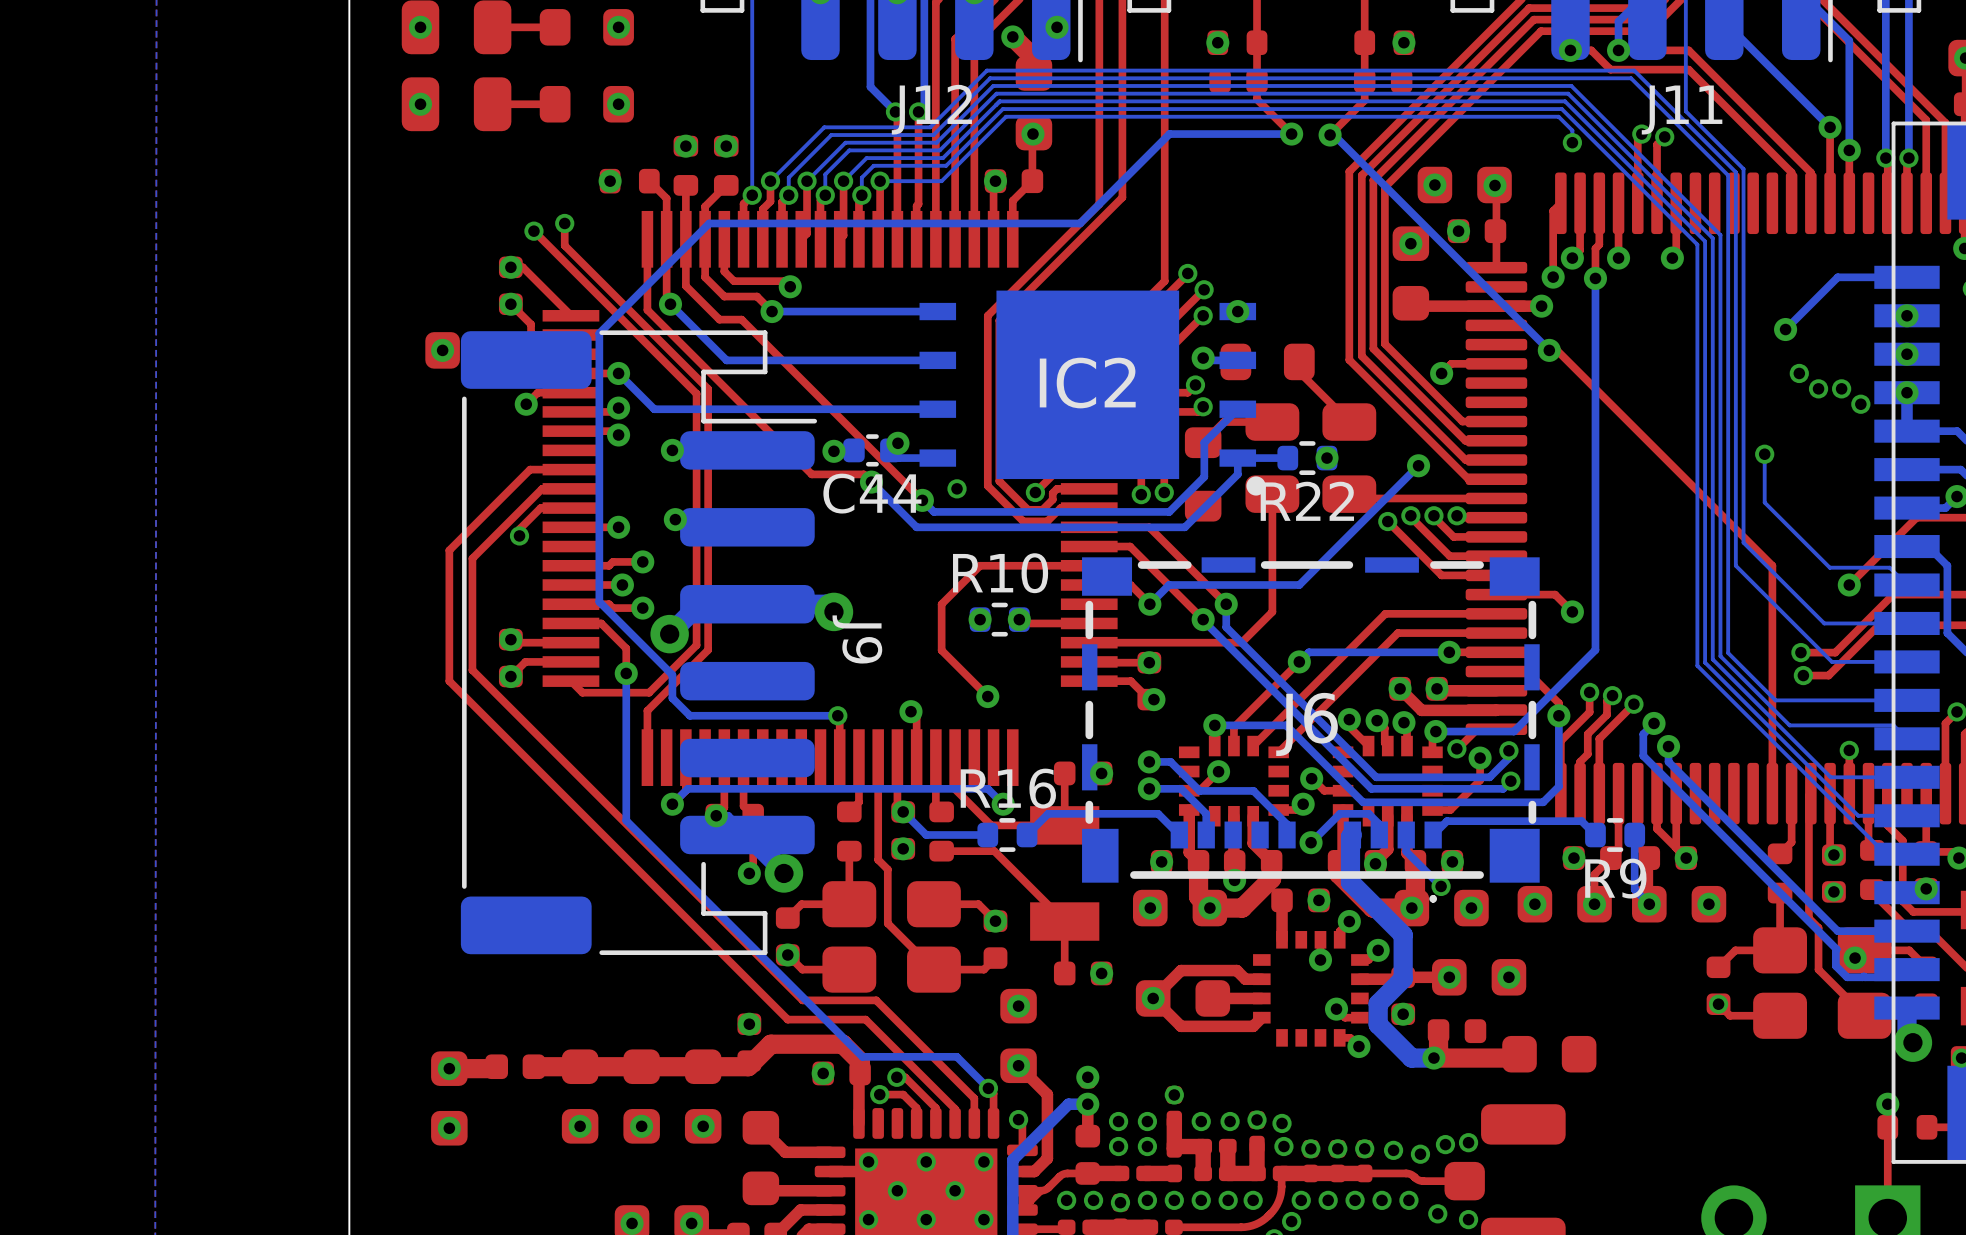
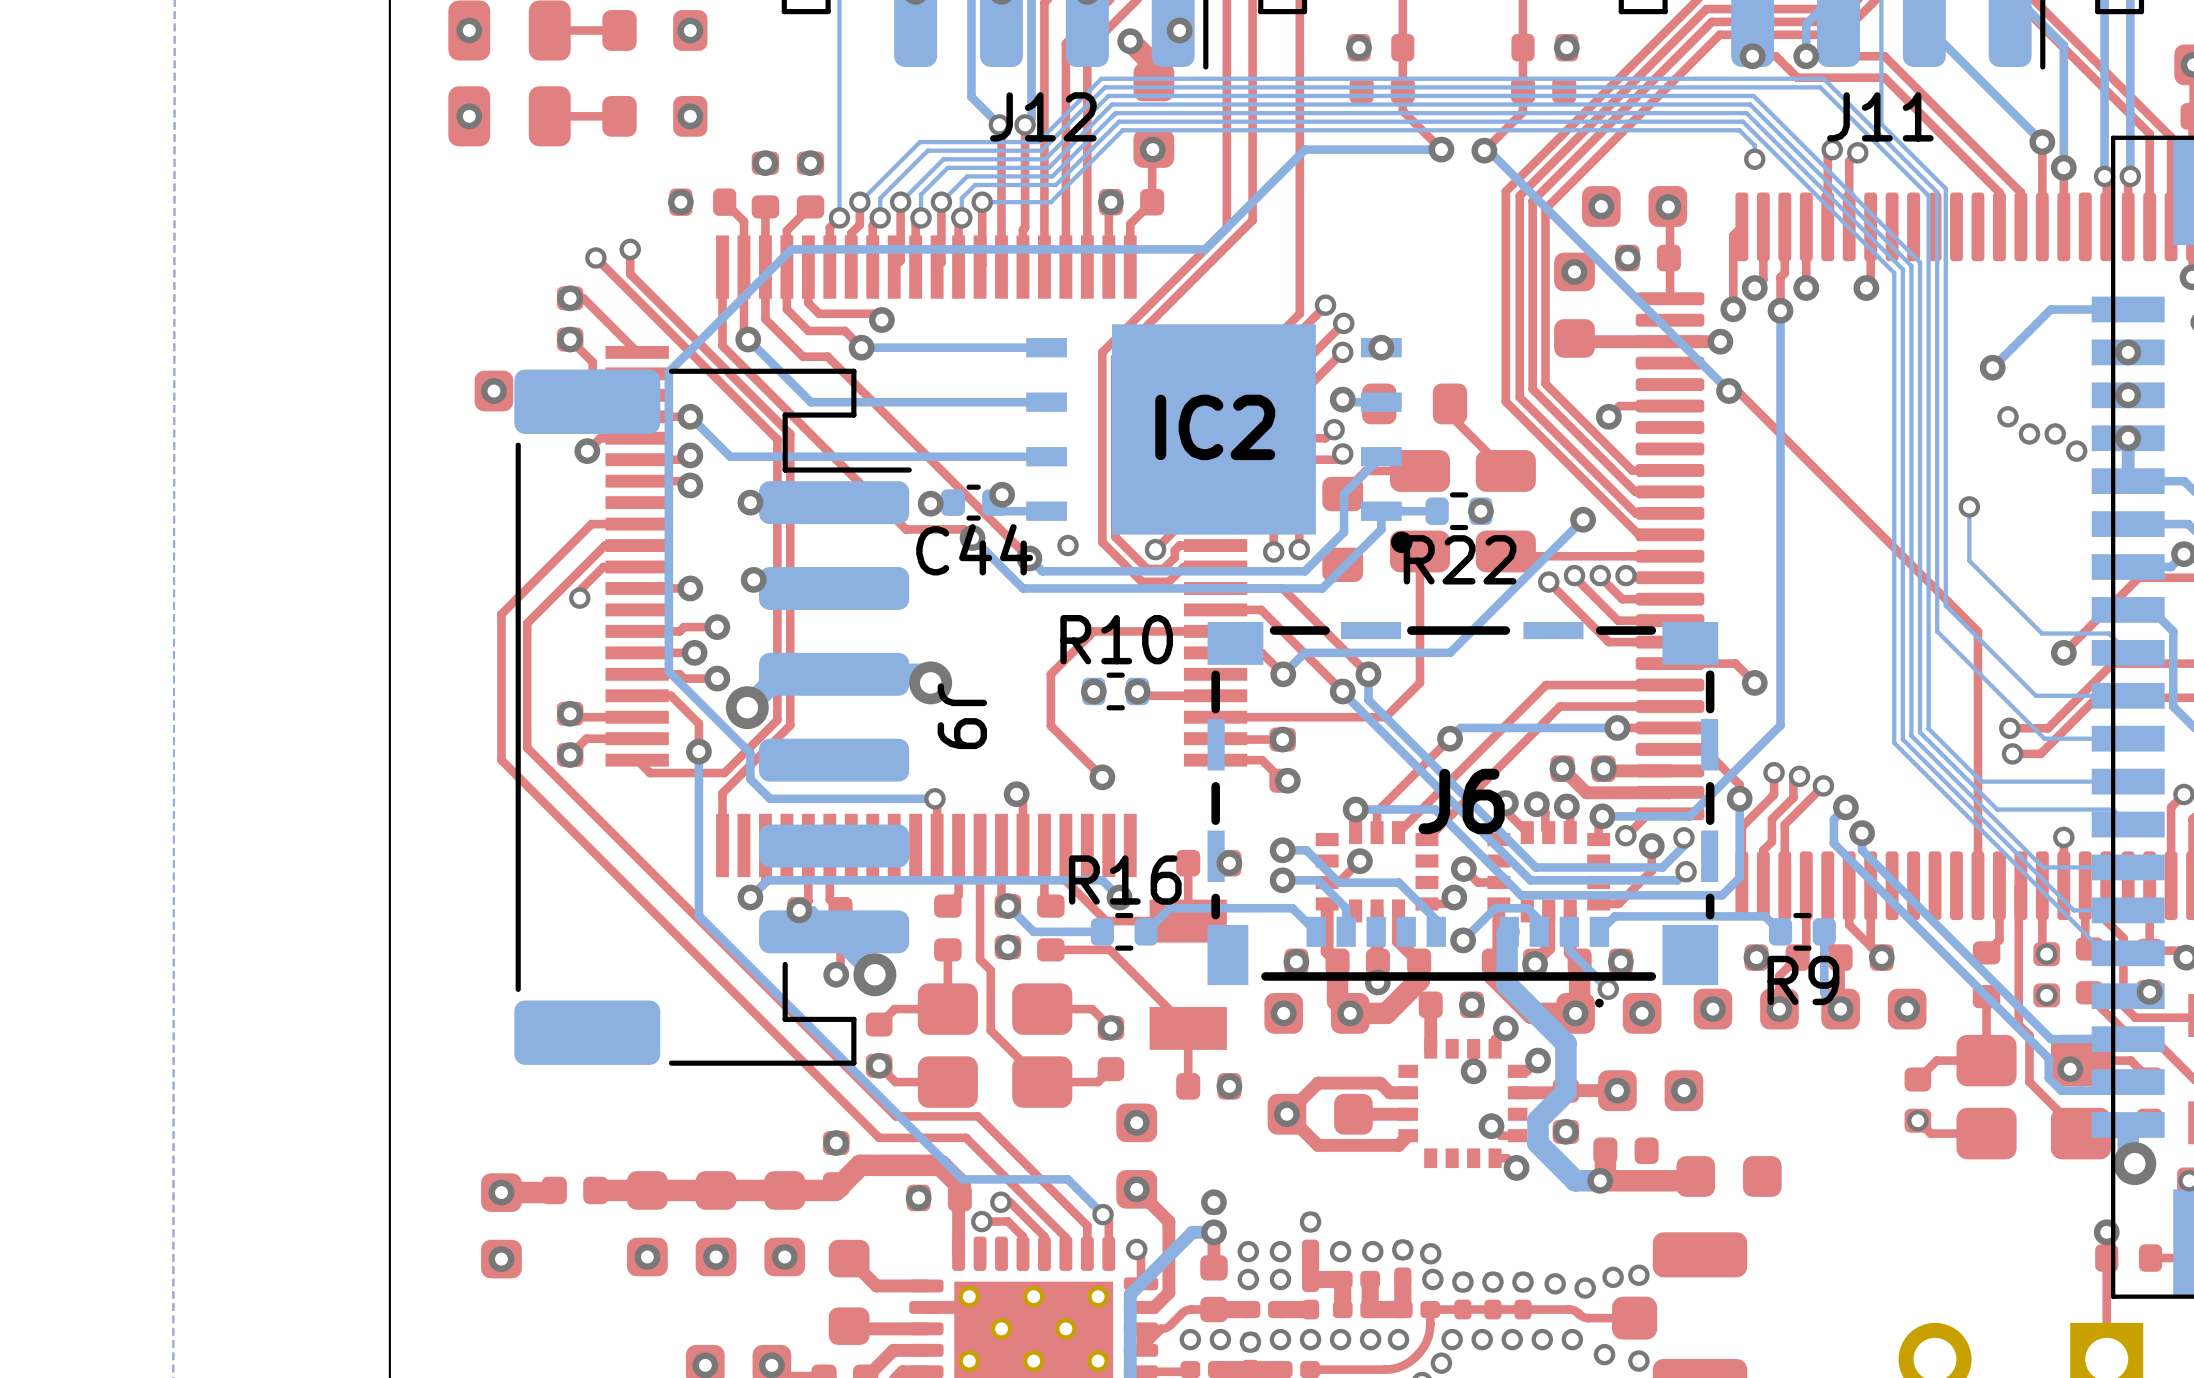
top track width: thick (1364, 1173) (1281, 1173) -> thin (1522, 1309) (1430, 1309)

